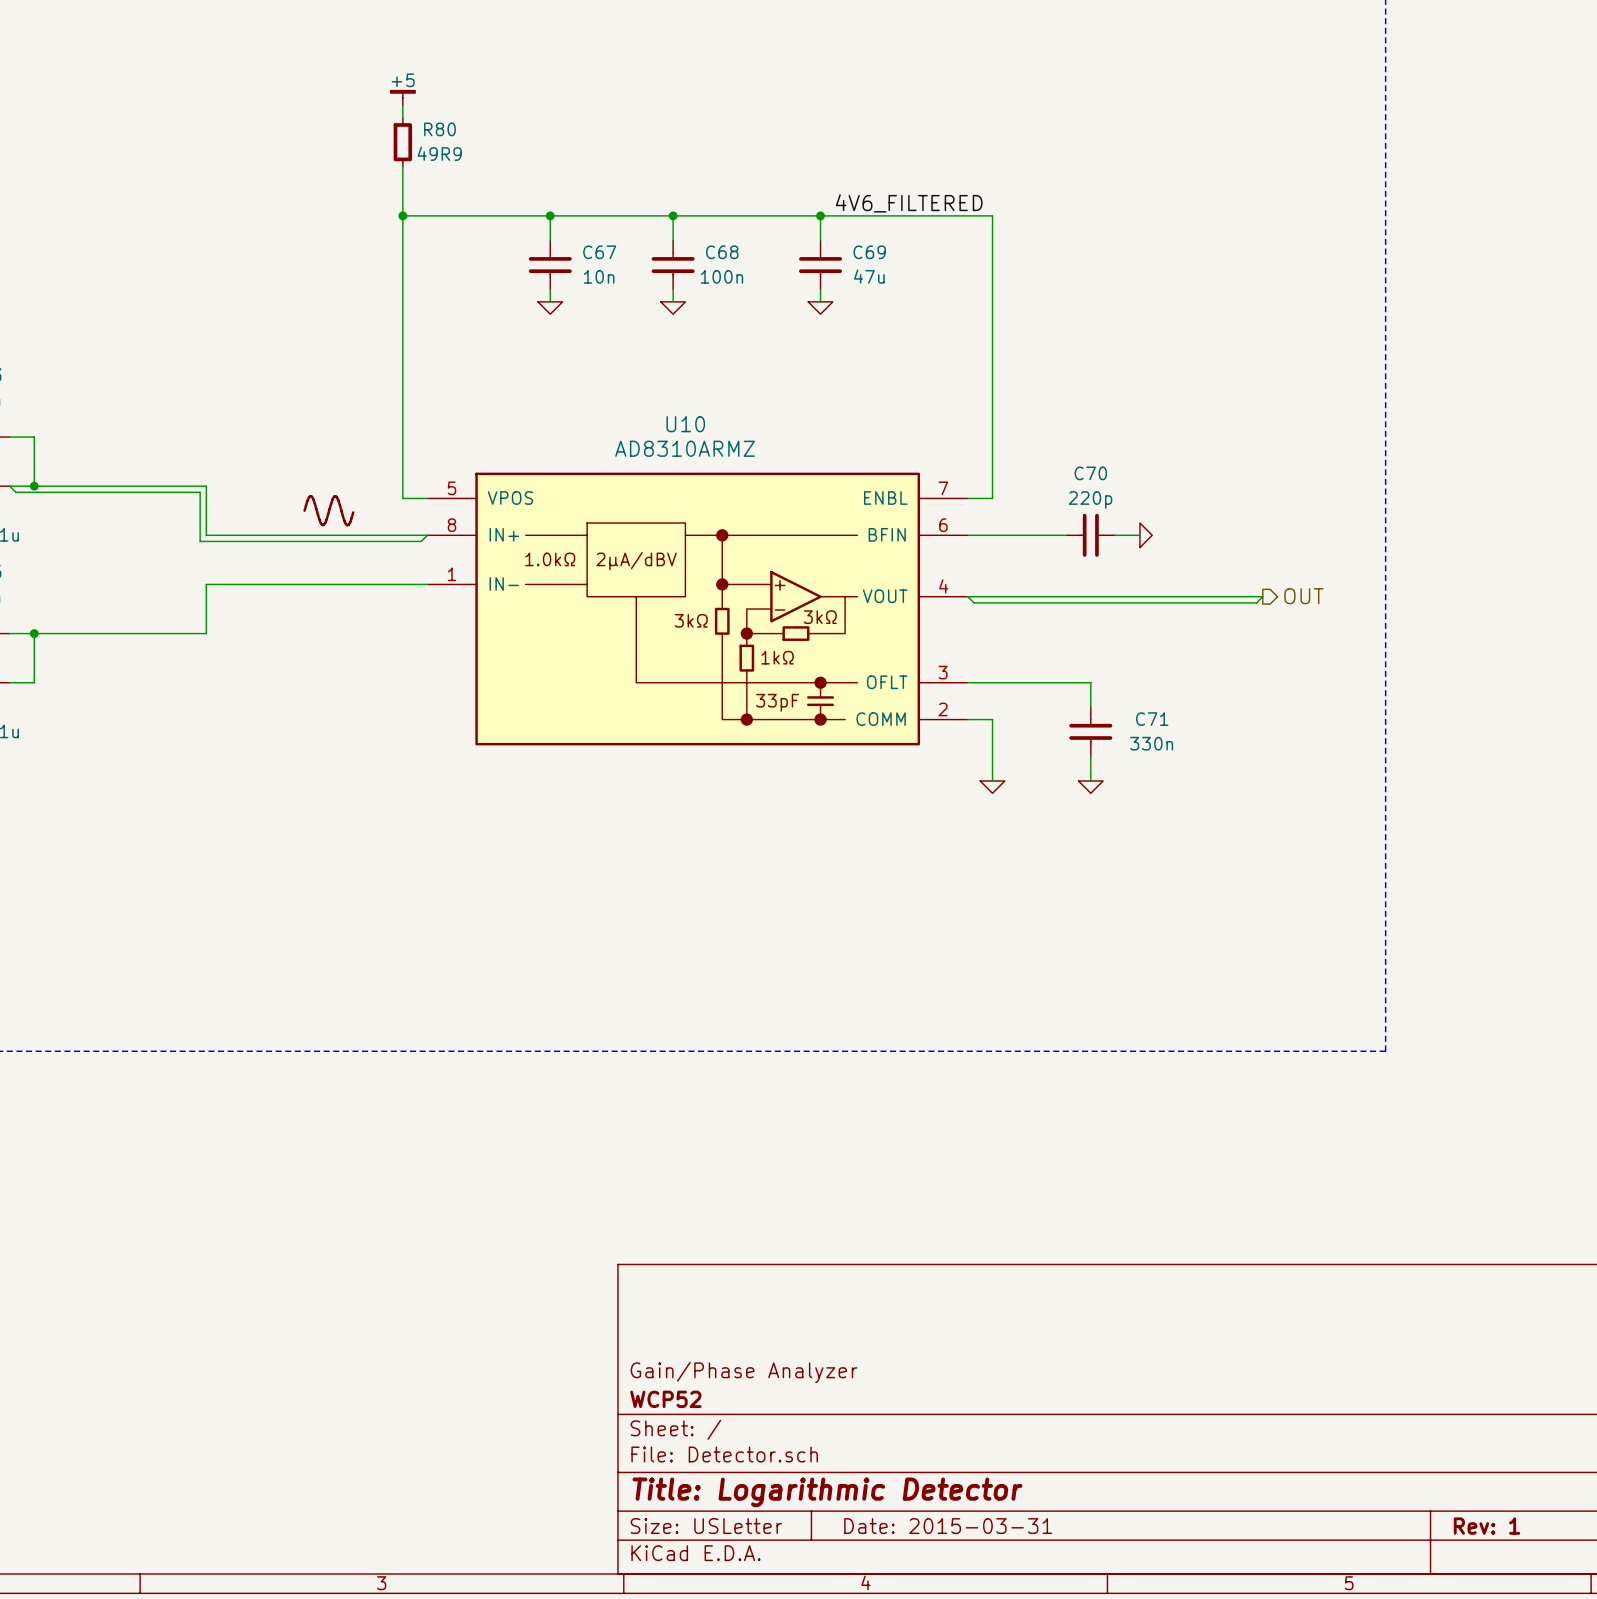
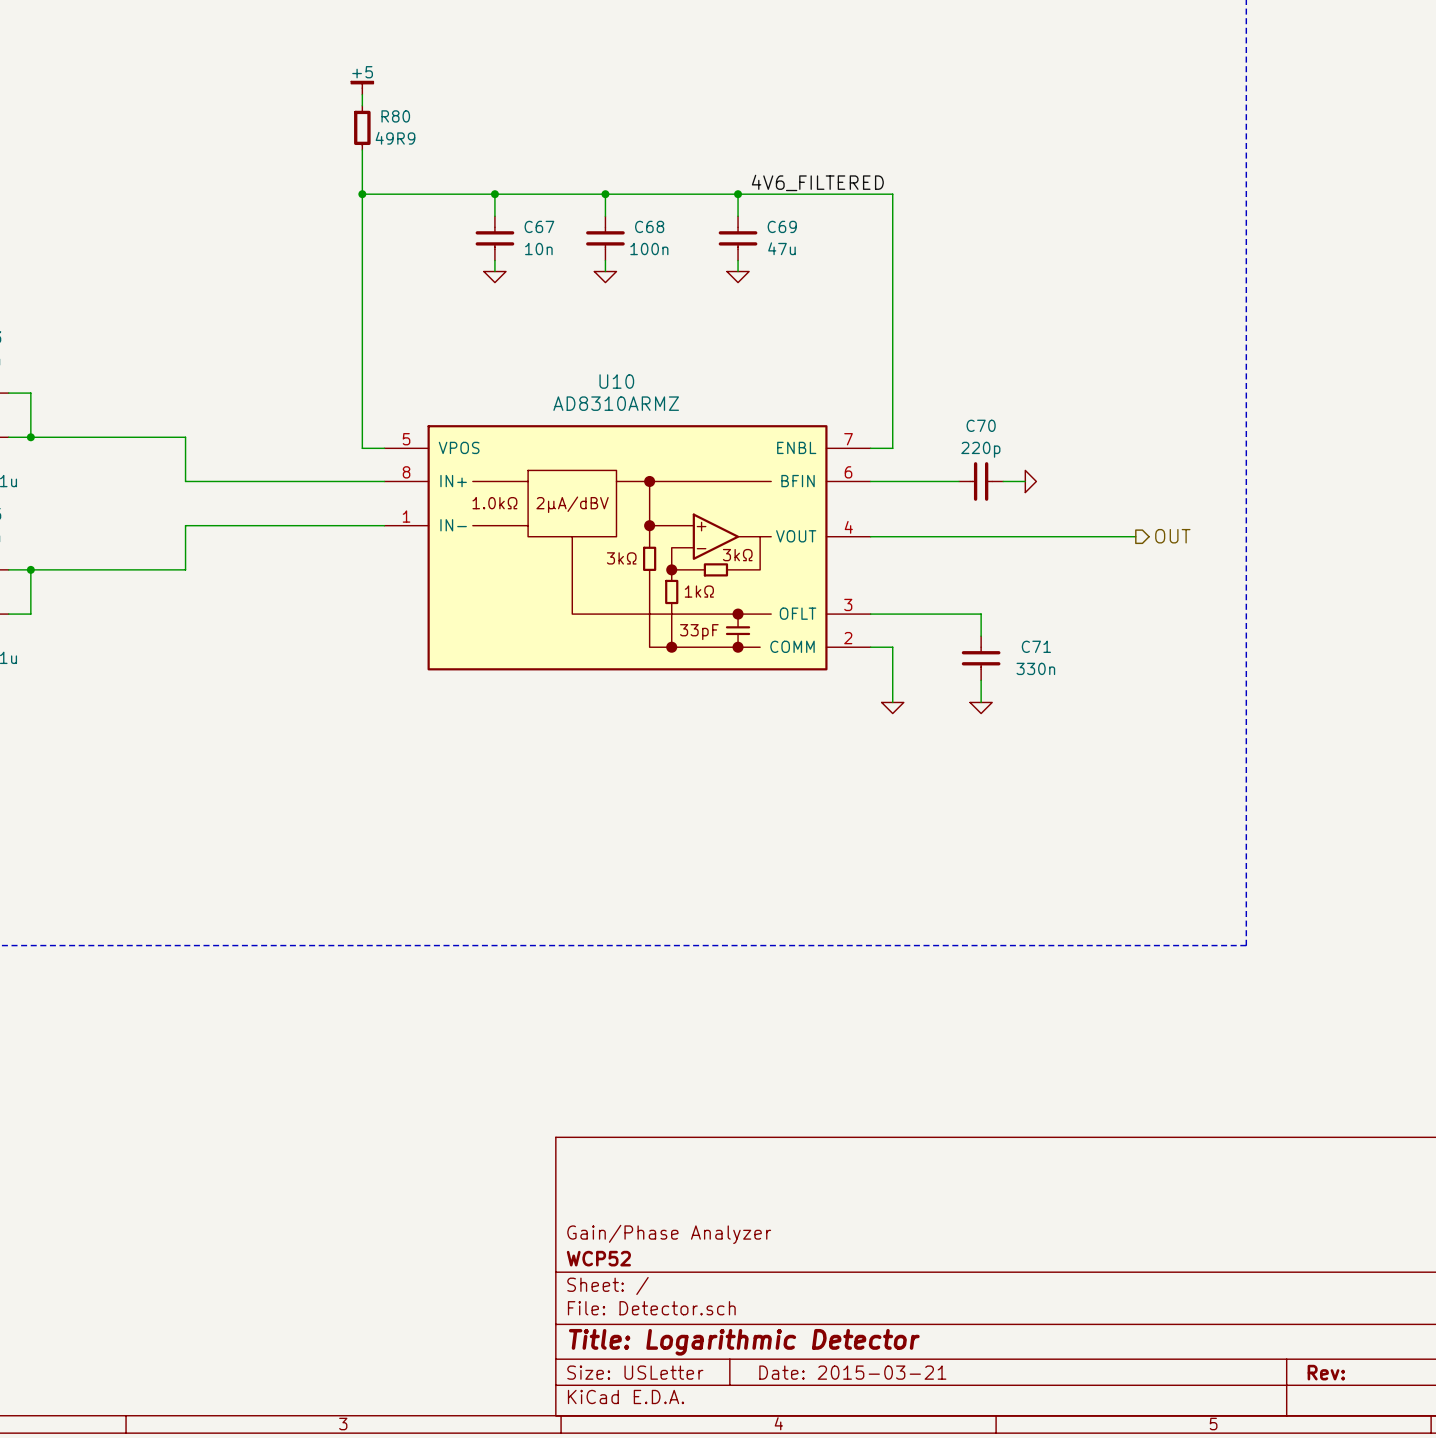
wire: (9, 486) (15, 492) (200, 492) (200, 541) (421, 541) (427, 535) -> none
power symbol: (328, 510) -> none
wire: (967, 596) (974, 602) (1256, 602) (1262, 596) -> none
title block: Date: 2015-03-31 (948, 1526) -> Date: 2015-03-21 (852, 1372)
title block: Rev: 1 (1487, 1526) -> Rev: (1326, 1372)

